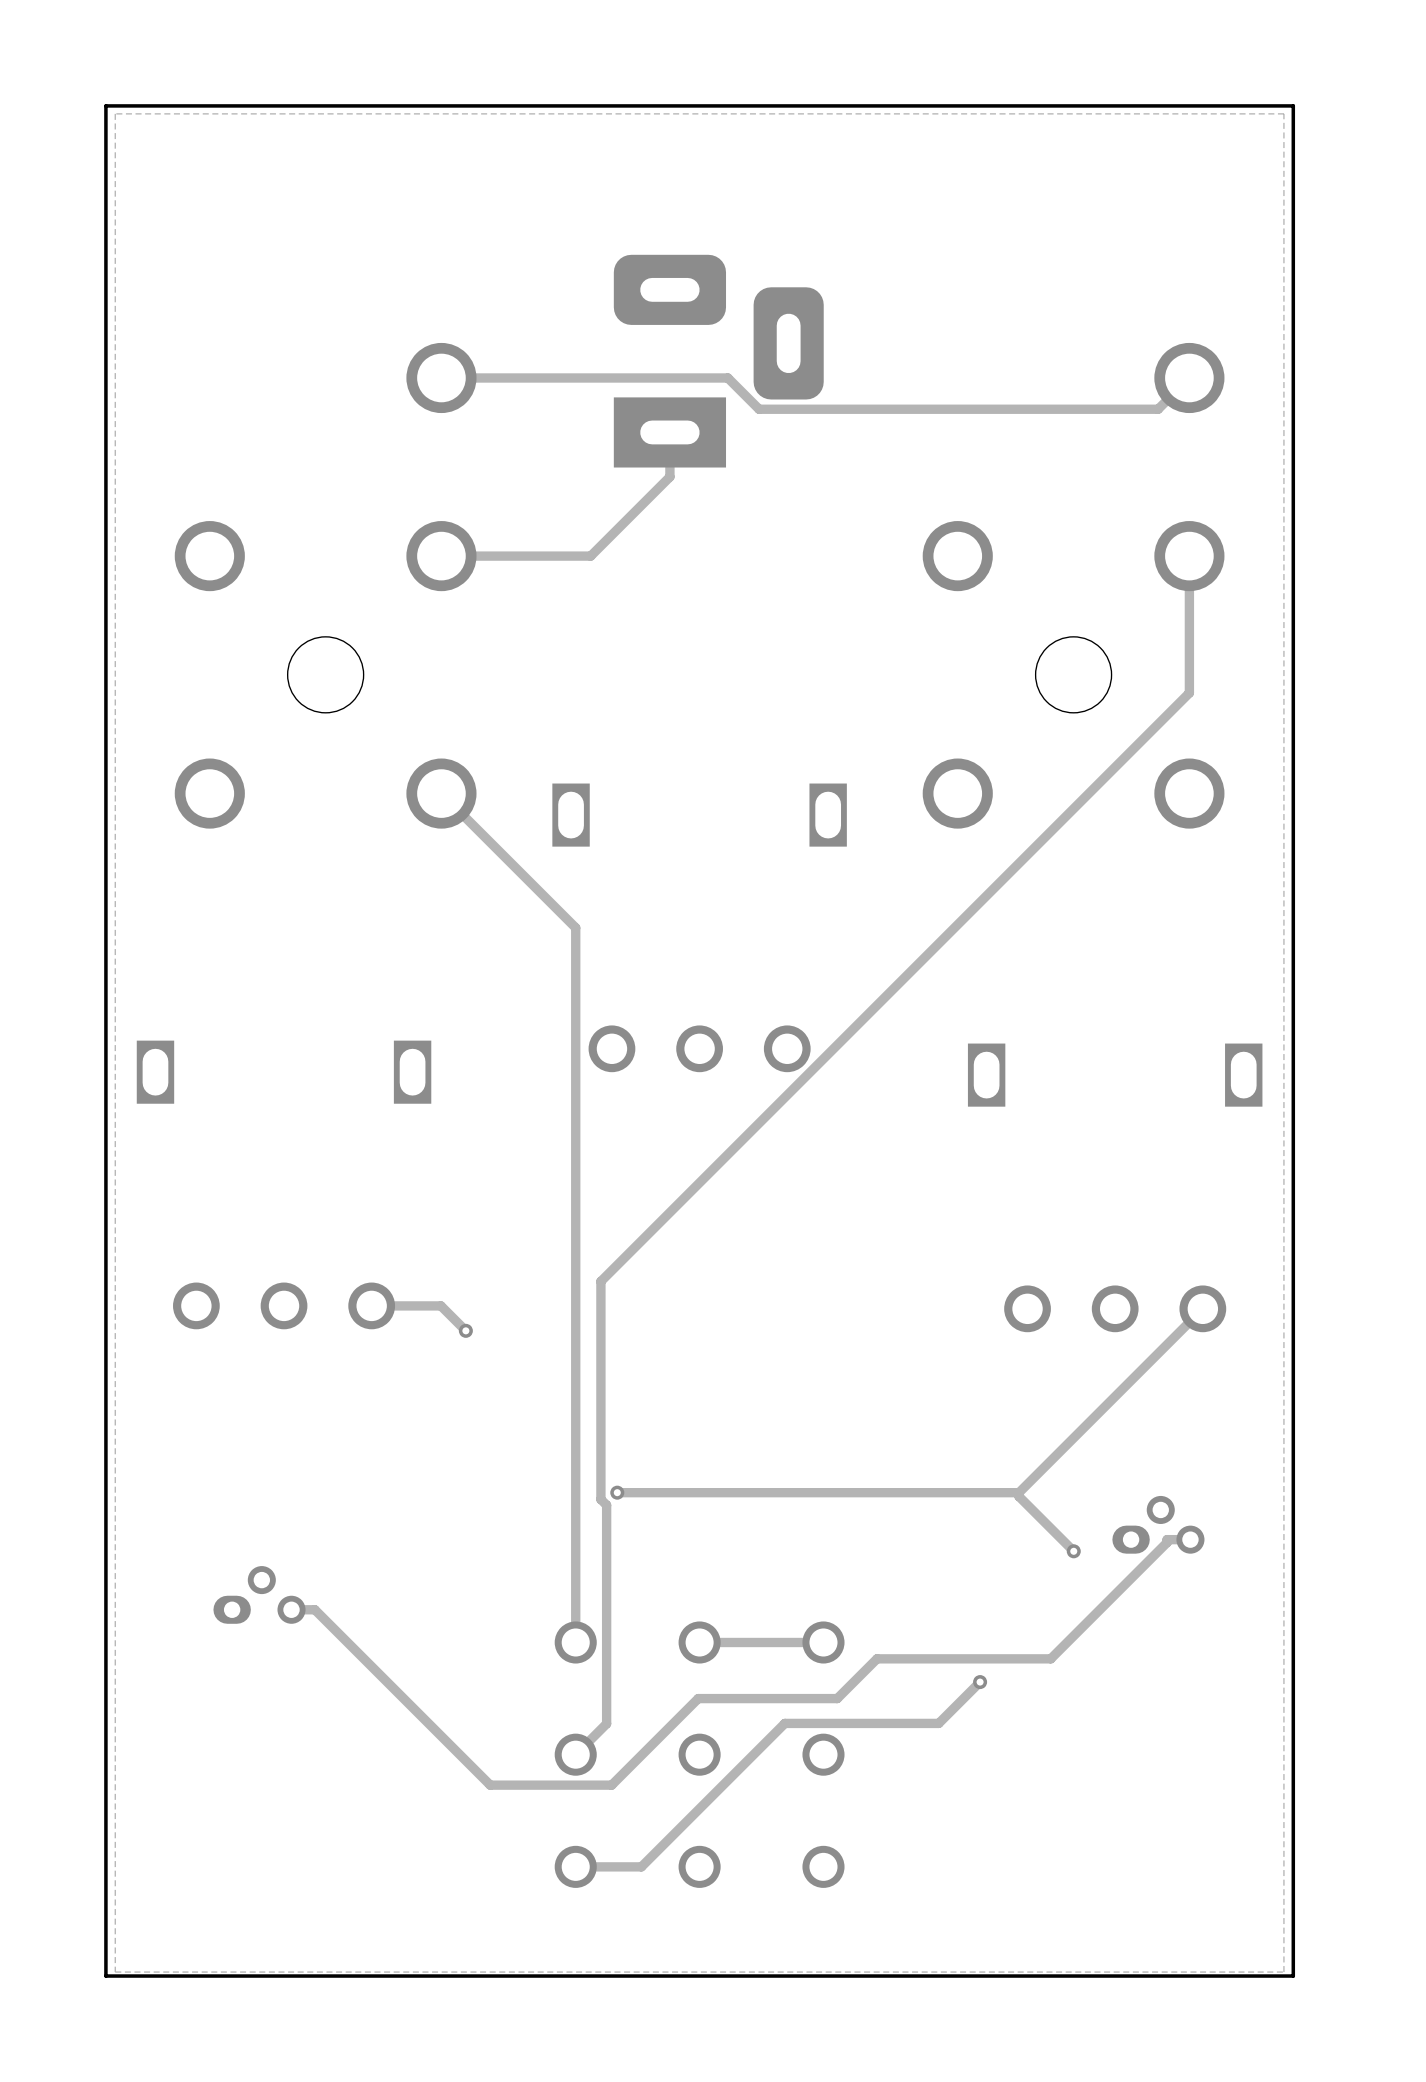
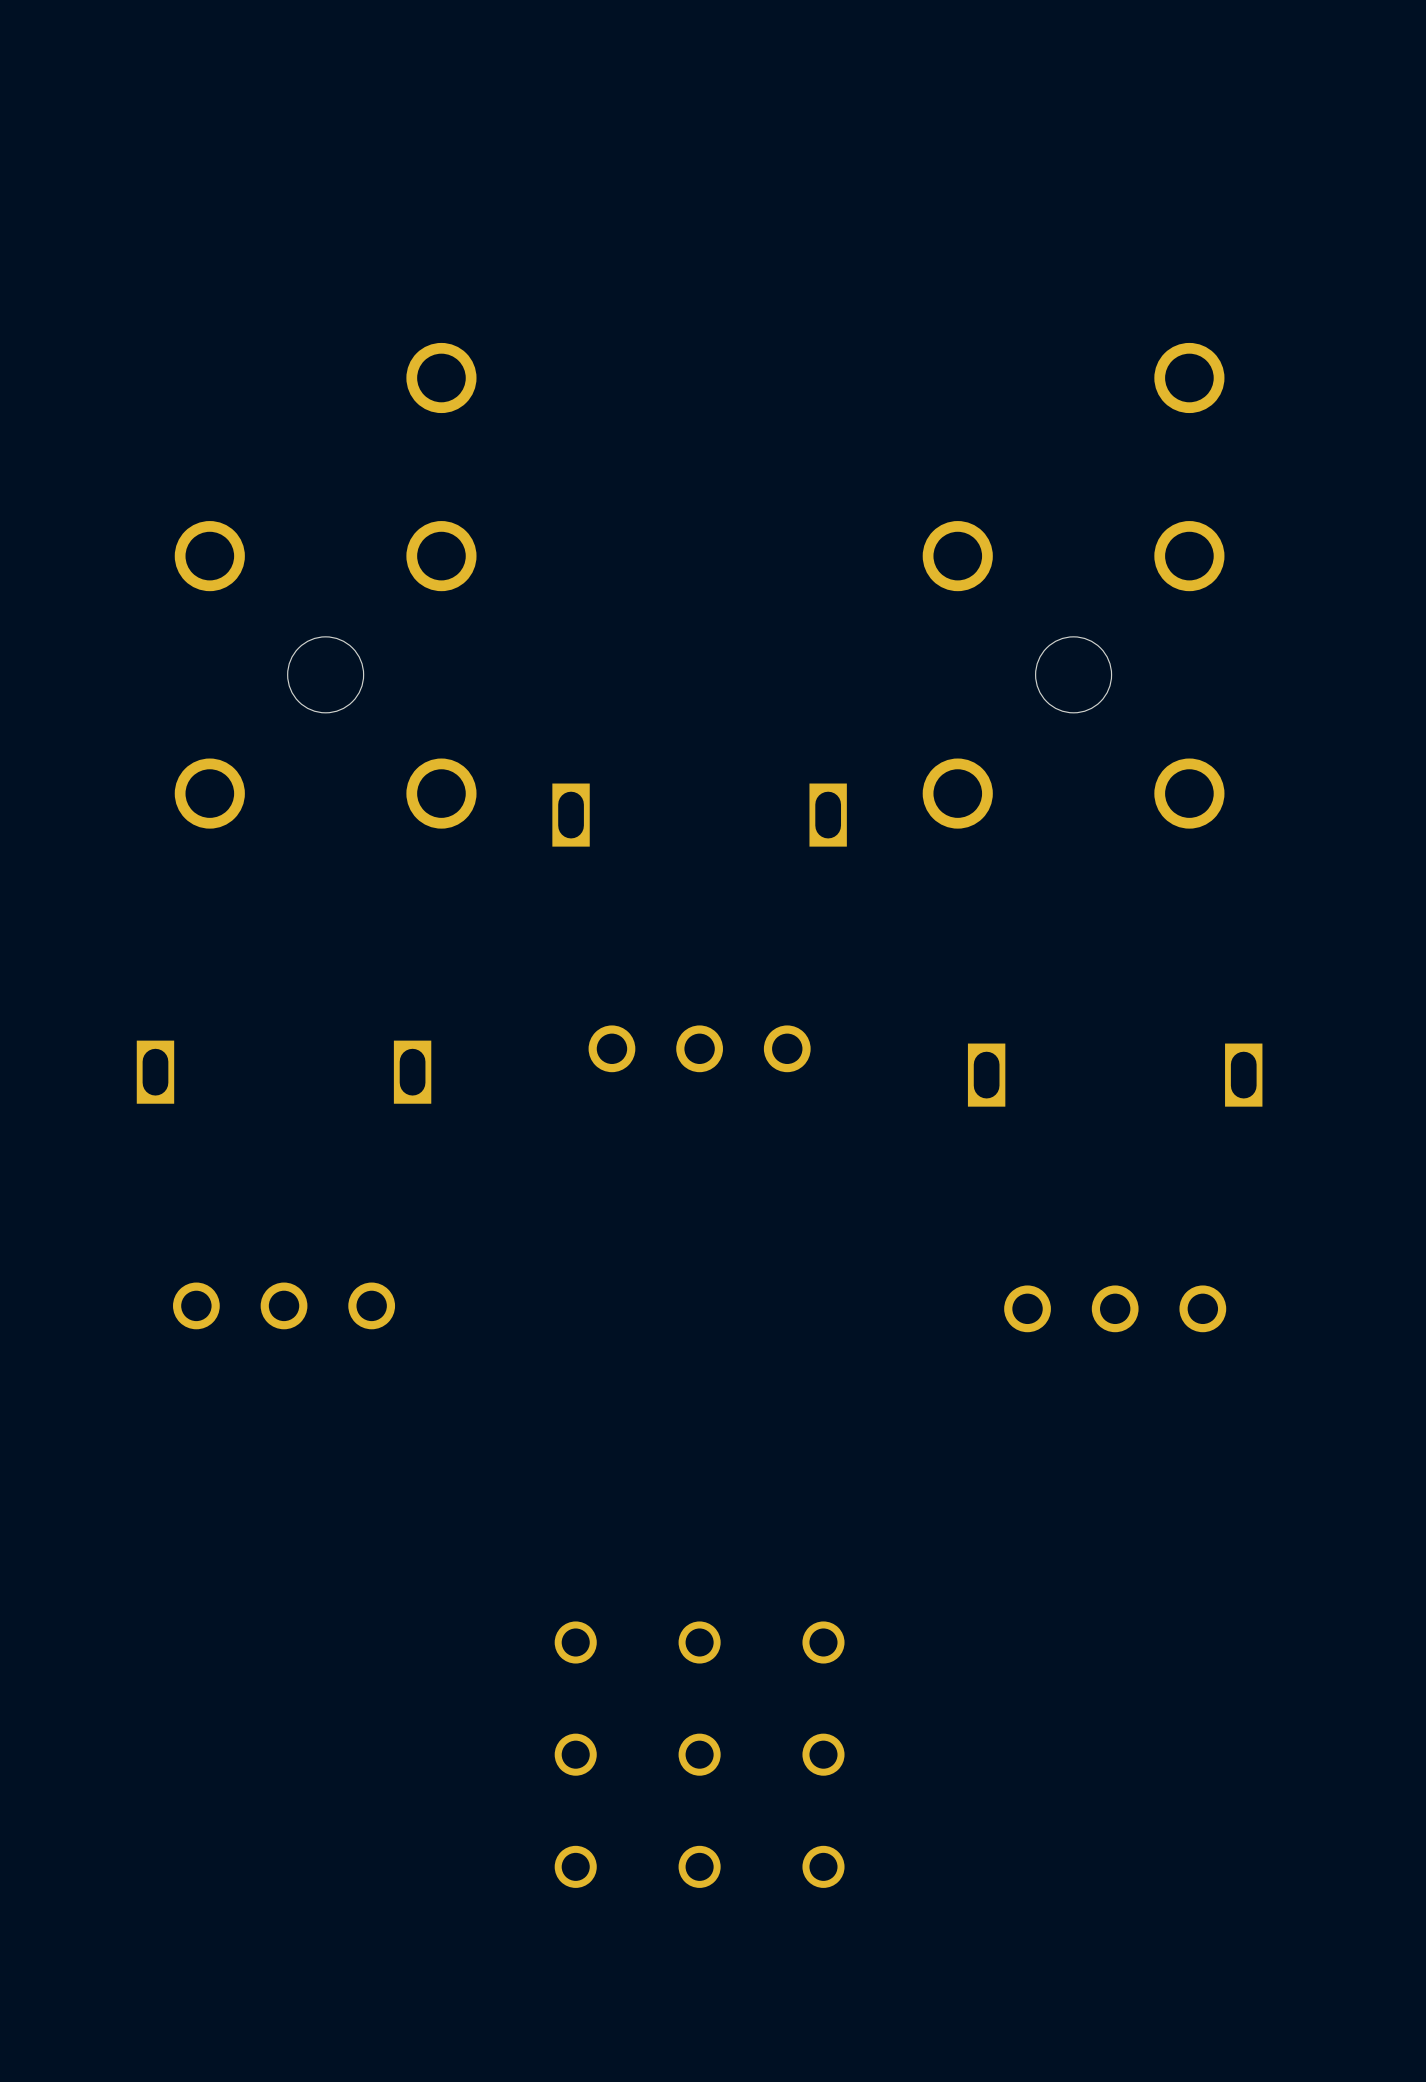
board edge: (1293, 105) (1293, 1976) (105, 1976) (105, 105) (1293, 105) -> none
zone outline: (1283, 113) (115, 113) (115, 1972) (1283, 1972) (1283, 113) -> none
part: (718, 361) -> none
track: (1189, 377) (1158, 409) (759, 409) (727, 377) (441, 377) -> none
track: (669, 432) (669, 476) (590, 556) (441, 556) -> none
track: (1189, 556) (1189, 692) (600, 1281) (600, 1499) (606, 1505) (606, 1723) (575, 1754) -> none
track: (441, 793) (575, 927) (575, 1642) -> none
track: (371, 1305) (440, 1305) (465, 1330) -> none
track: (1202, 1308) (1019, 1492) -> none
via: (465, 1330) -> none
via: (617, 1492) -> none
track: (1019, 1492) (1019, 1496) (1073, 1551) -> none
track: (1019, 1492) (617, 1492) -> none
part: (1158, 1524) -> none
track: (1190, 1539) (1167, 1539) (1167, 1542) (1050, 1658) (877, 1658) (837, 1698) (698, 1698) (611, 1785) (490, 1785) (314, 1609) (291, 1609) -> none
via: (1073, 1551) -> none
part: (259, 1594) -> none
track: (823, 1642) (699, 1642) -> none
track: (980, 1682) (938, 1723) (784, 1723) (641, 1866) (575, 1866) -> none
via: (980, 1682) -> none

